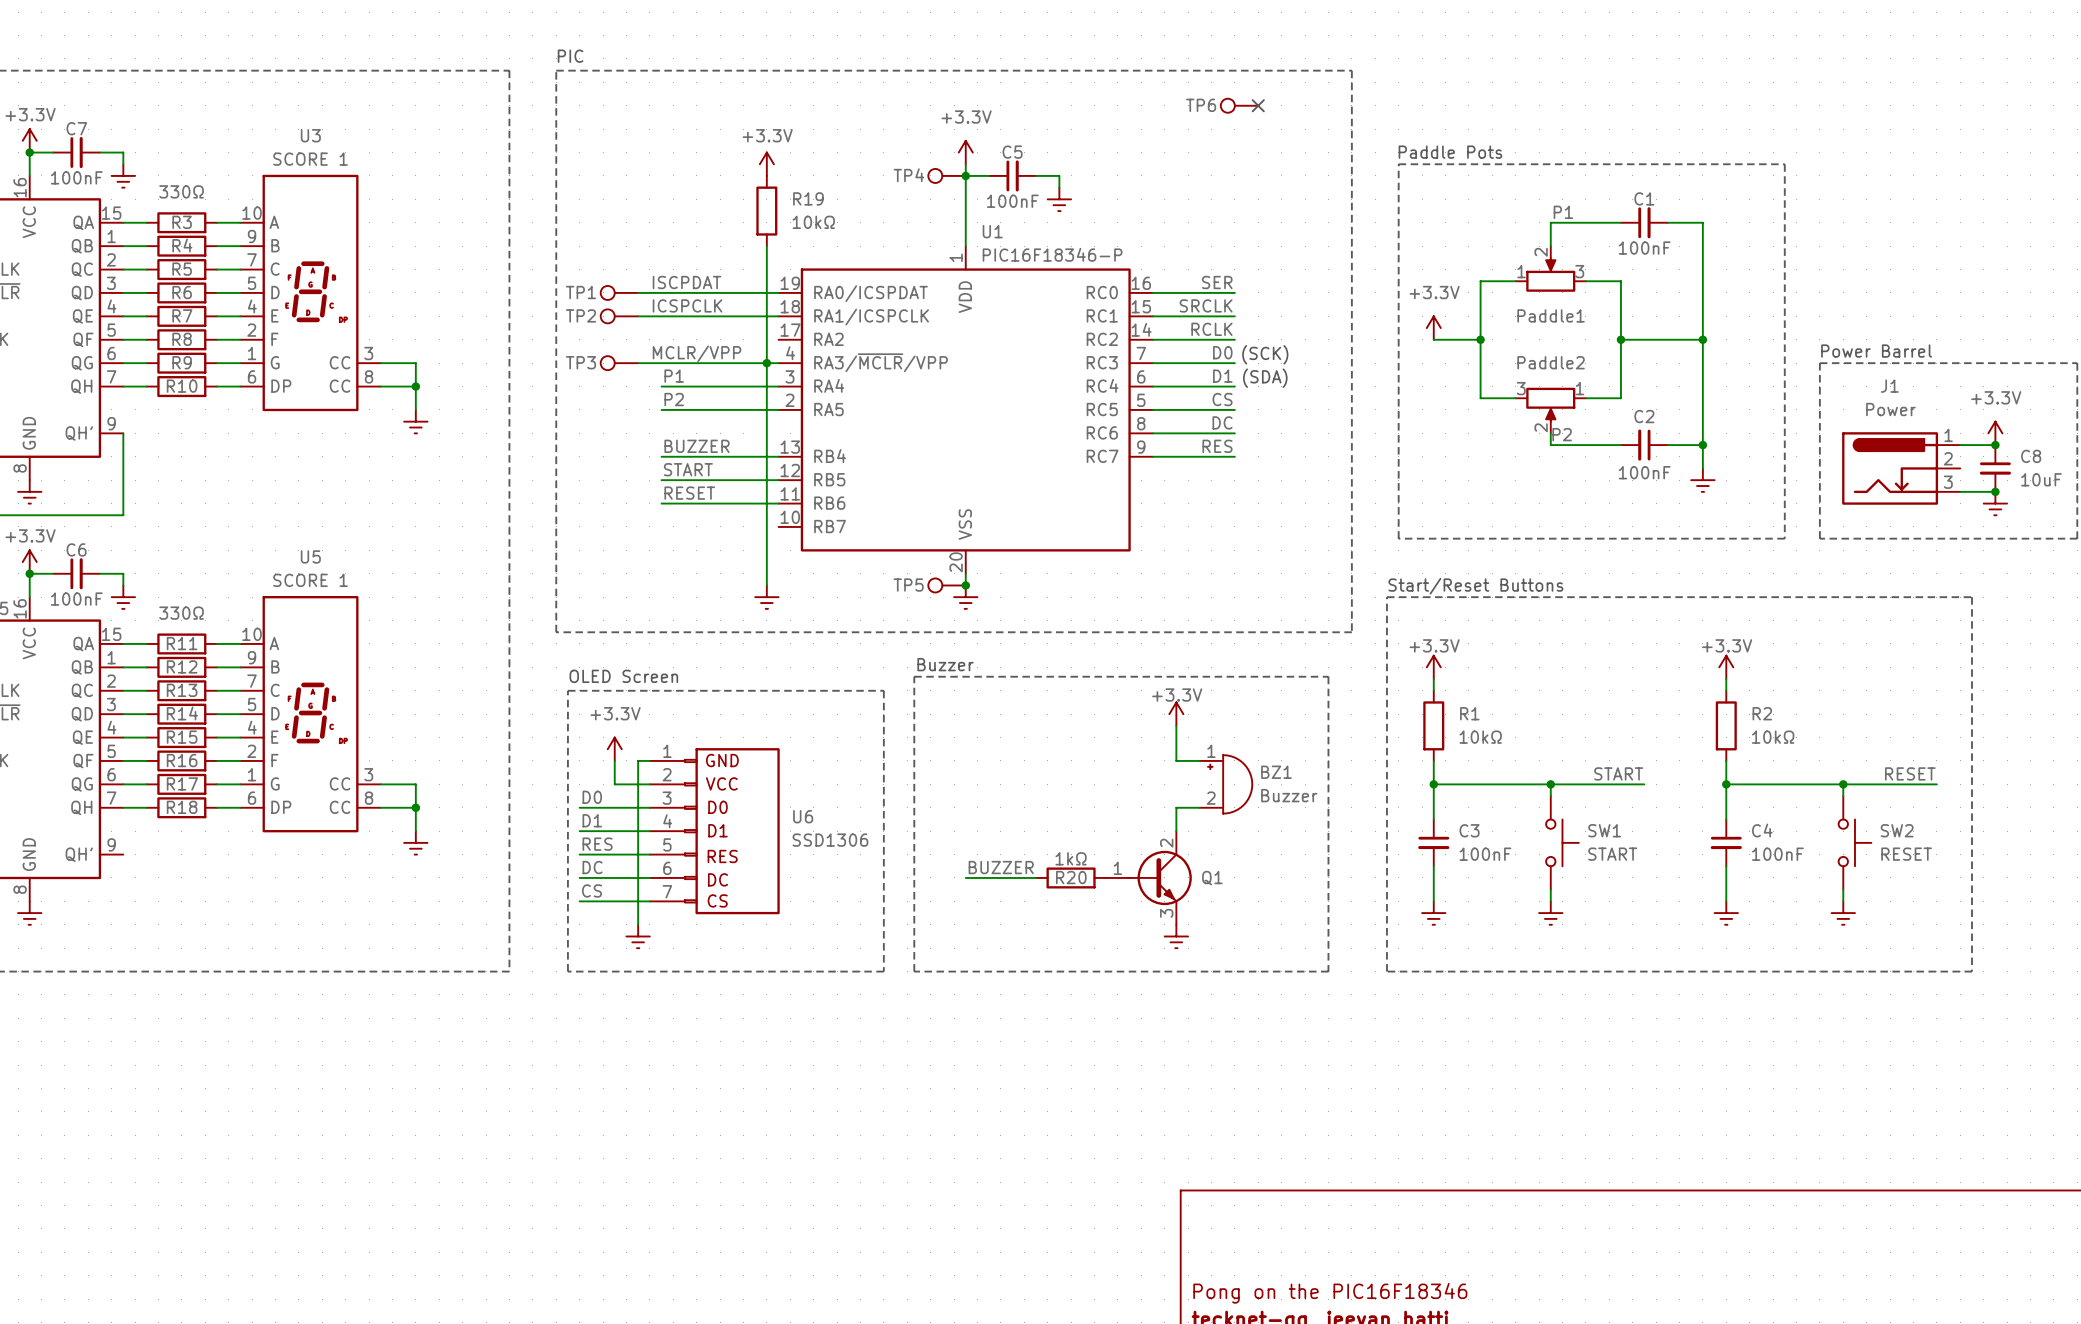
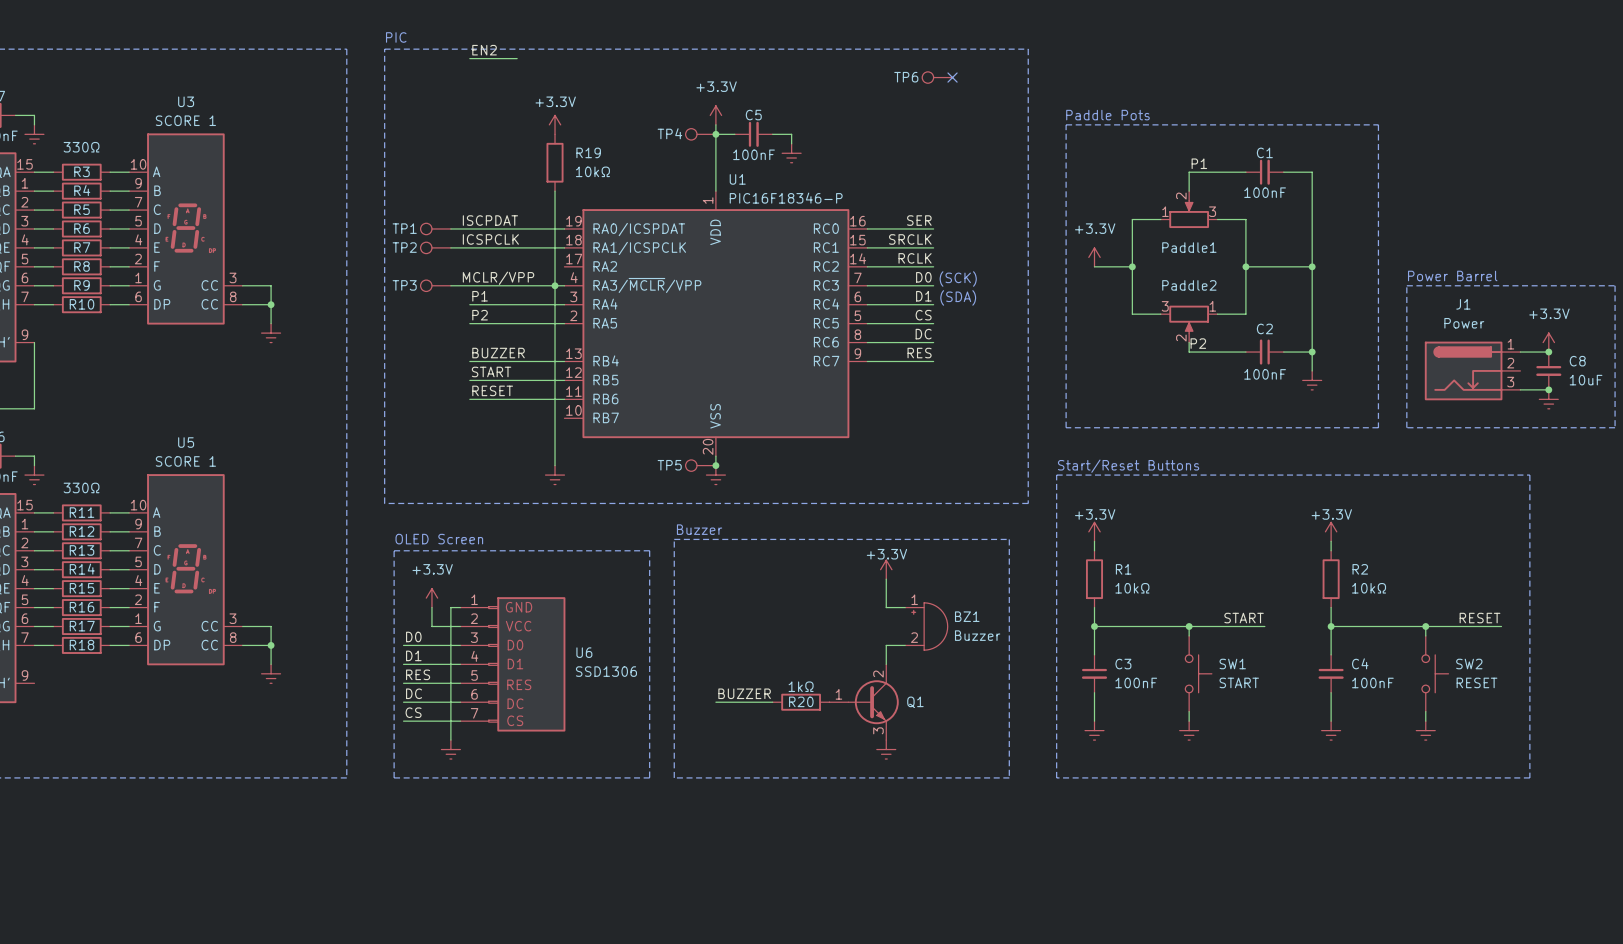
label: none -> EN2 (484, 50)
wire: none -> (469, 58) (517, 58)

